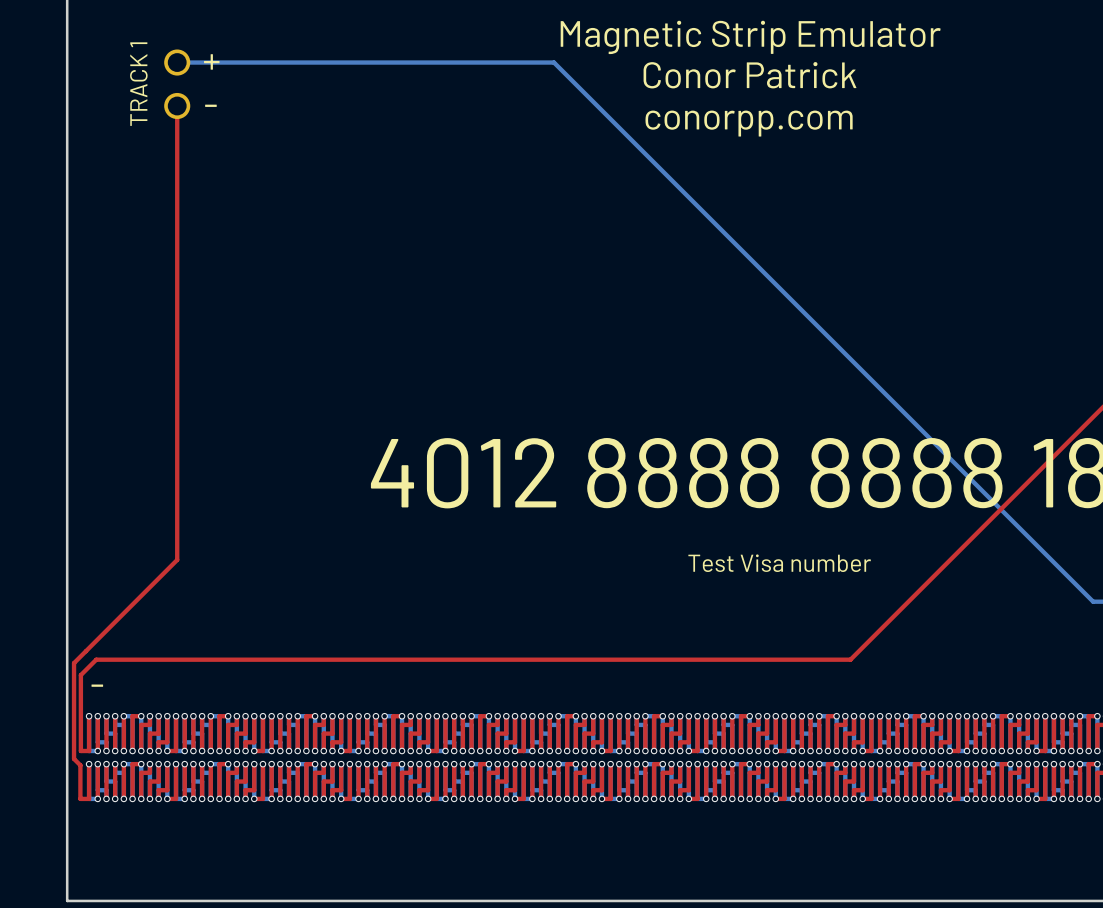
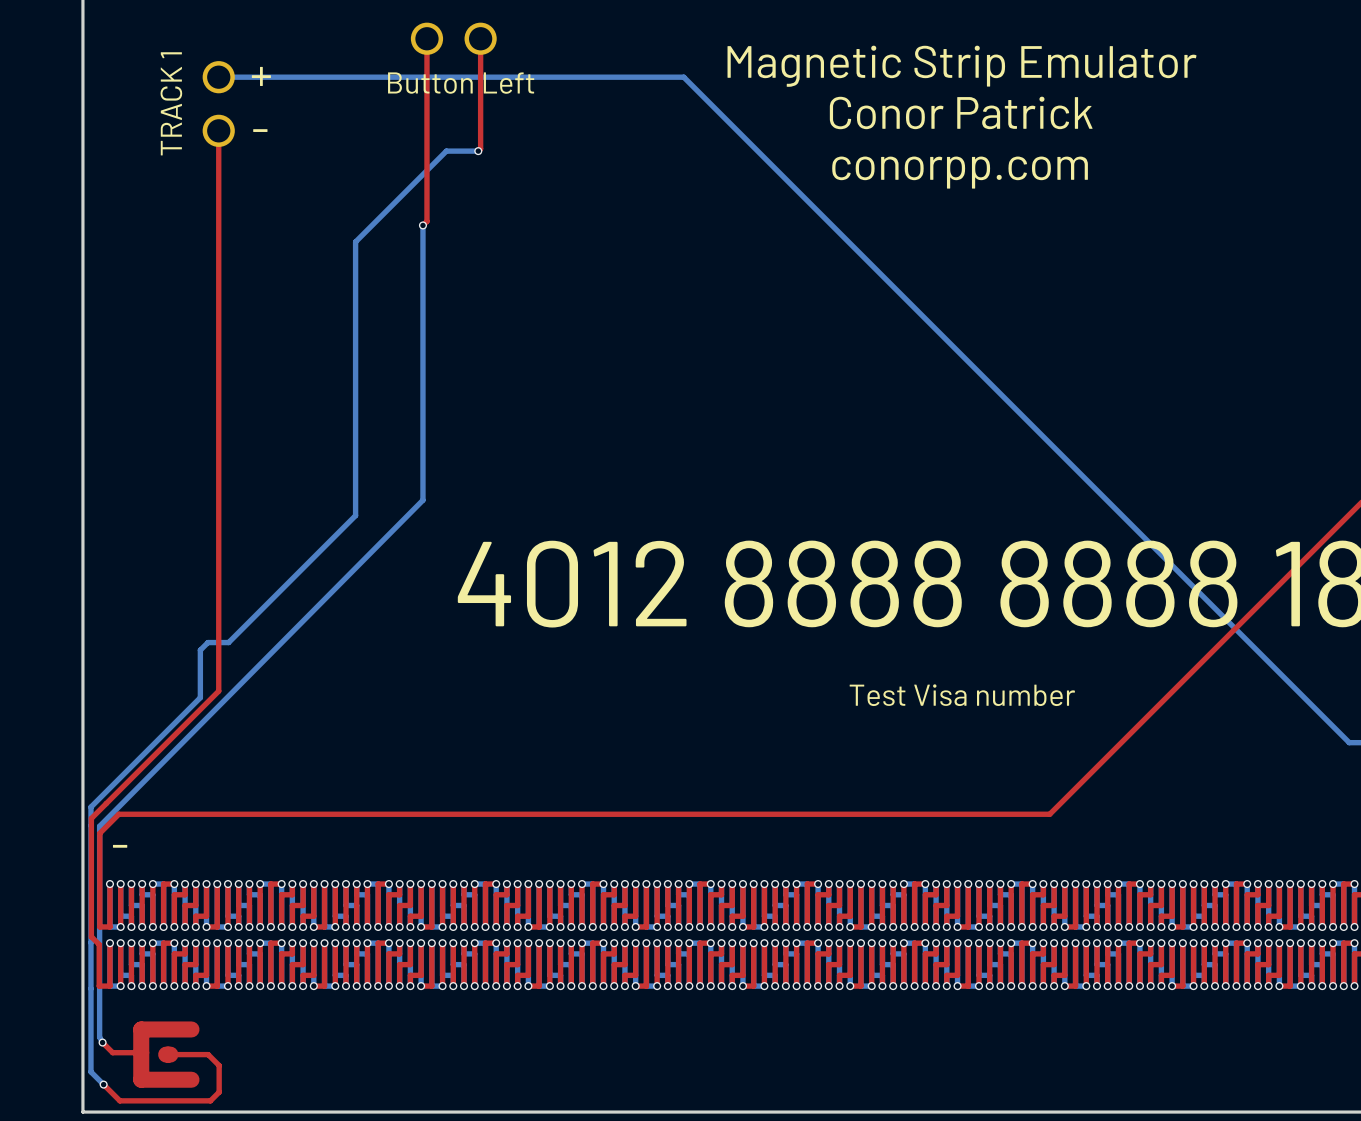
top track: none -> (426, 38) (426, 221) (422, 225)
Button Left: none -> (453, 38)
top track: none -> (480, 38) (480, 148) (478, 151)
text position: Magnetic Strip Emulator (750, 37) -> Magnetic Strip Emulator (962, 66)
text position: Conor Patrick (749, 75) -> Conor Patrick (961, 112)
bottom track: none -> (478, 151) (446, 151) (355, 241) (355, 515) (228, 642) (207, 642) (200, 650) (200, 697) (90, 807) (90, 1071) (103, 1084)
via: none -> (478, 151)
text position: conorpp.com (749, 123) -> conorpp.com (960, 172)
bottom track: none -> (422, 225) (422, 500) (99, 826) (99, 1037) (102, 1042)
via: none -> (422, 225)
top track: none -> (191, 1029) (141, 1029) (141, 1079) (191, 1079)
top track: none -> (102, 1042) (112, 1052) (141, 1052)
via: none -> (102, 1042)
top track: none -> (166, 1054) (170, 1054)
top track: none -> (168, 1054) (208, 1054) (219, 1065) (219, 1092) (210, 1100) (119, 1100) (103, 1084)
via: none -> (103, 1084)

